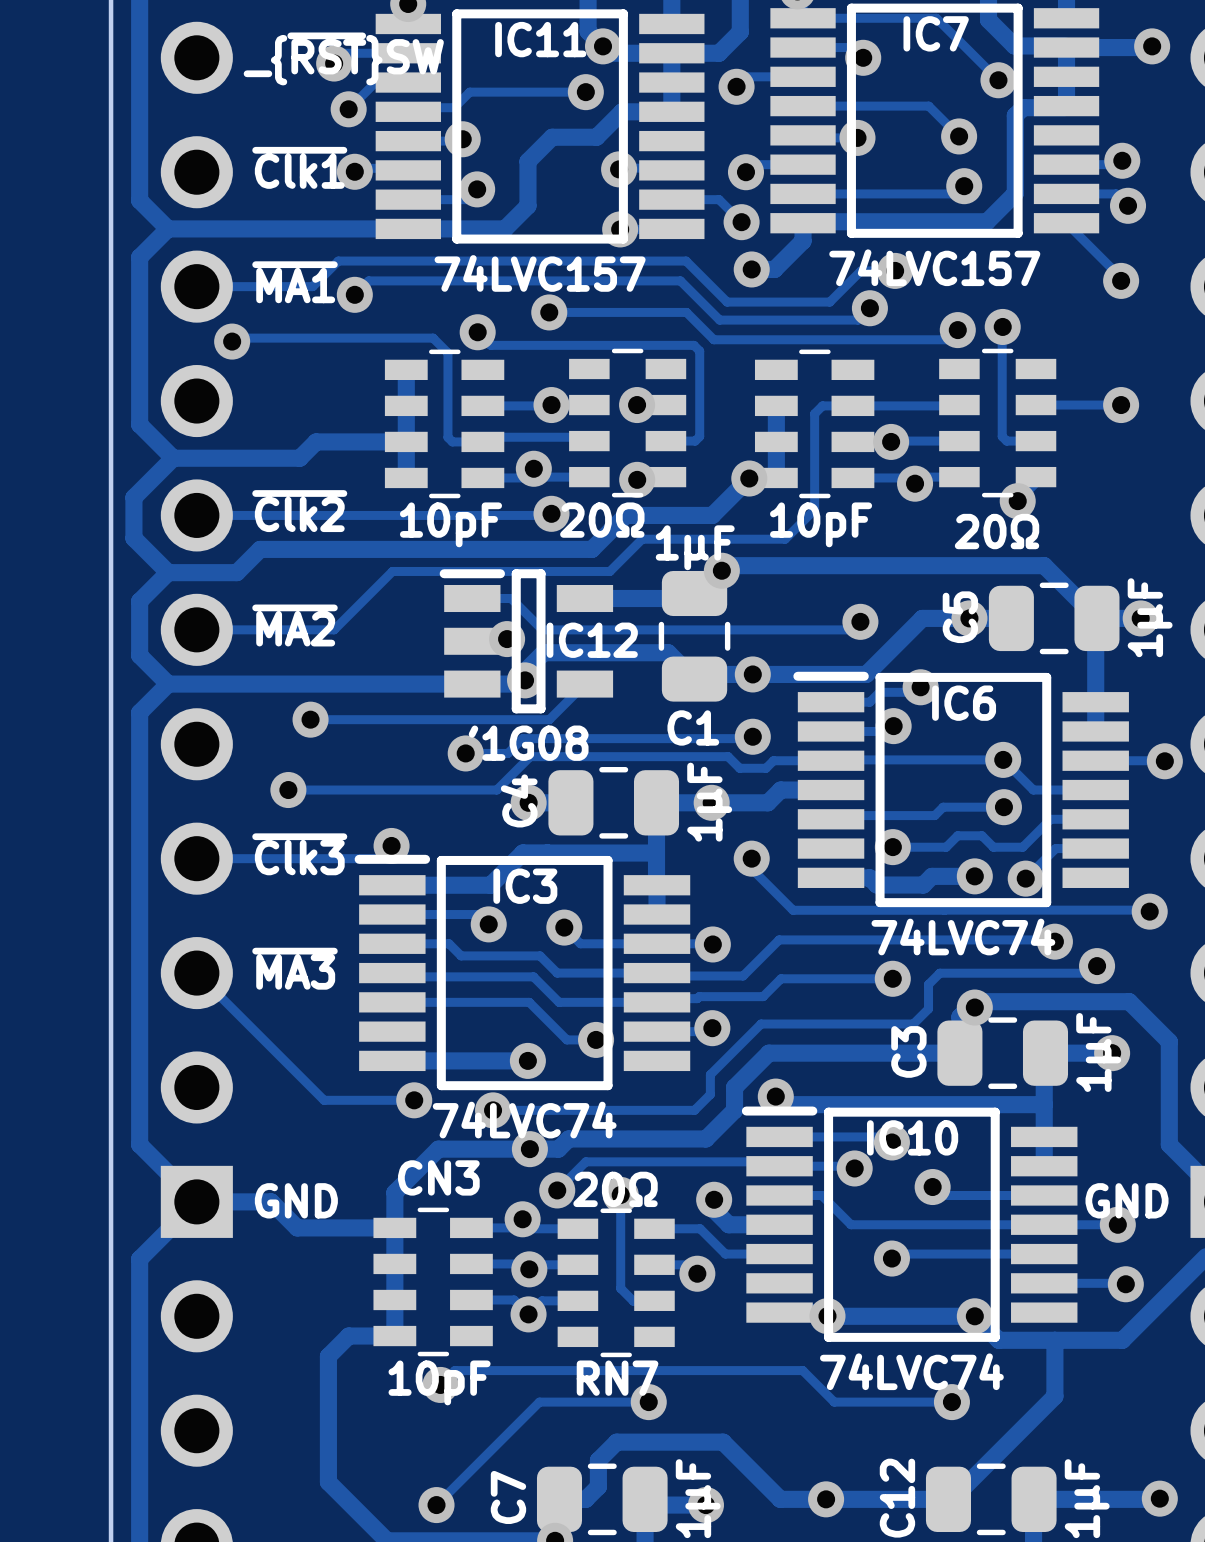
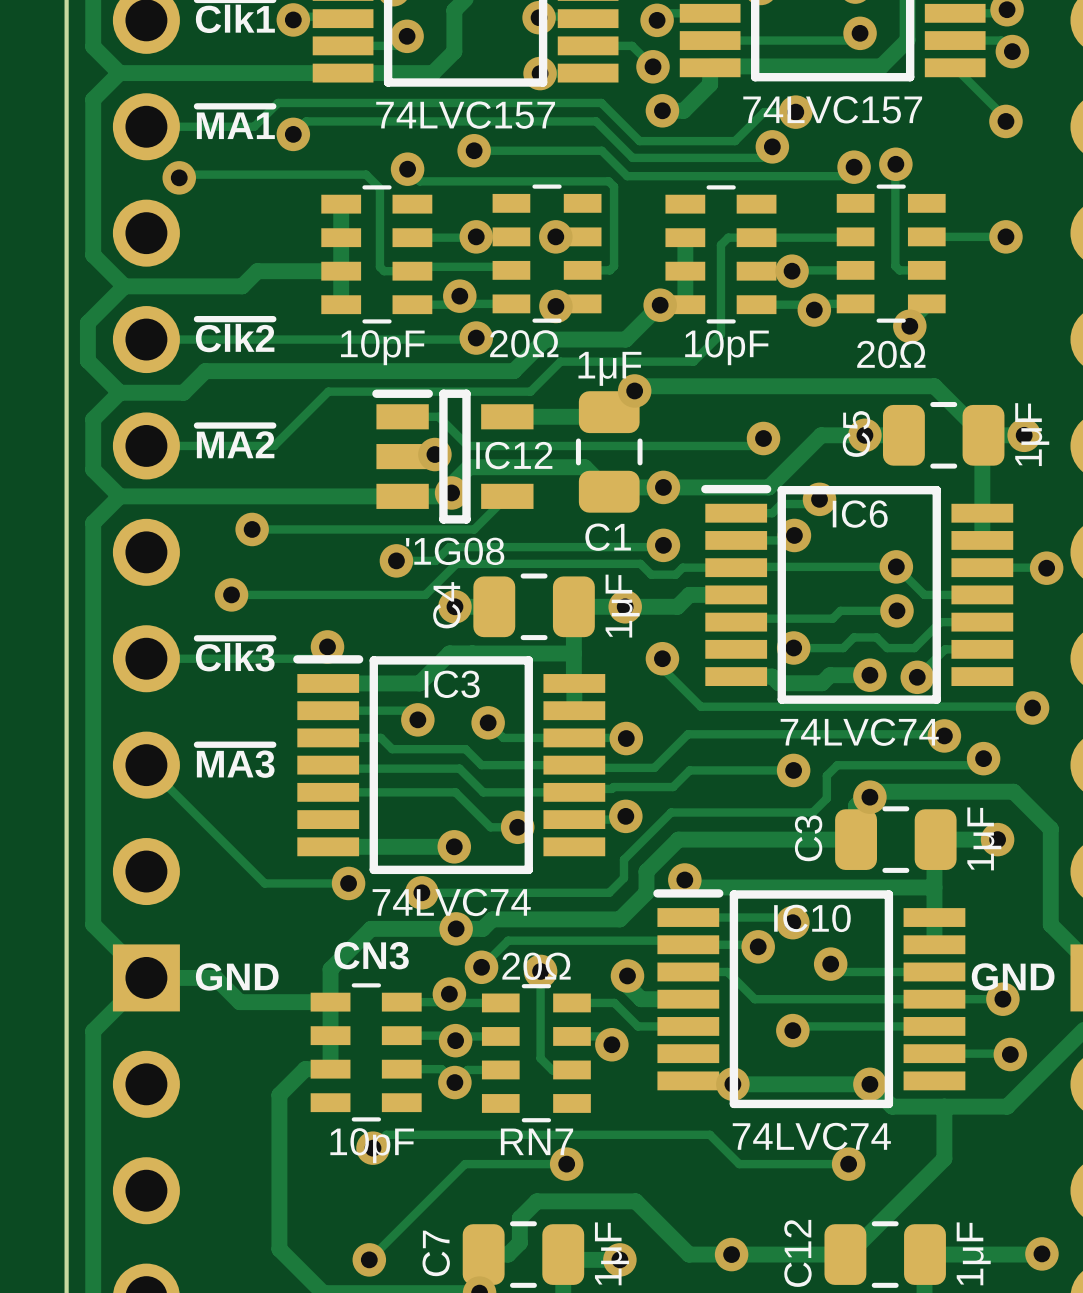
track: (394, 1299) (394, 1336) (348, 1336) (328, 1356) (328, 1482) (339, 1493) -> (330, 1069) (305, 1069) (279, 1094) (279, 1249)

